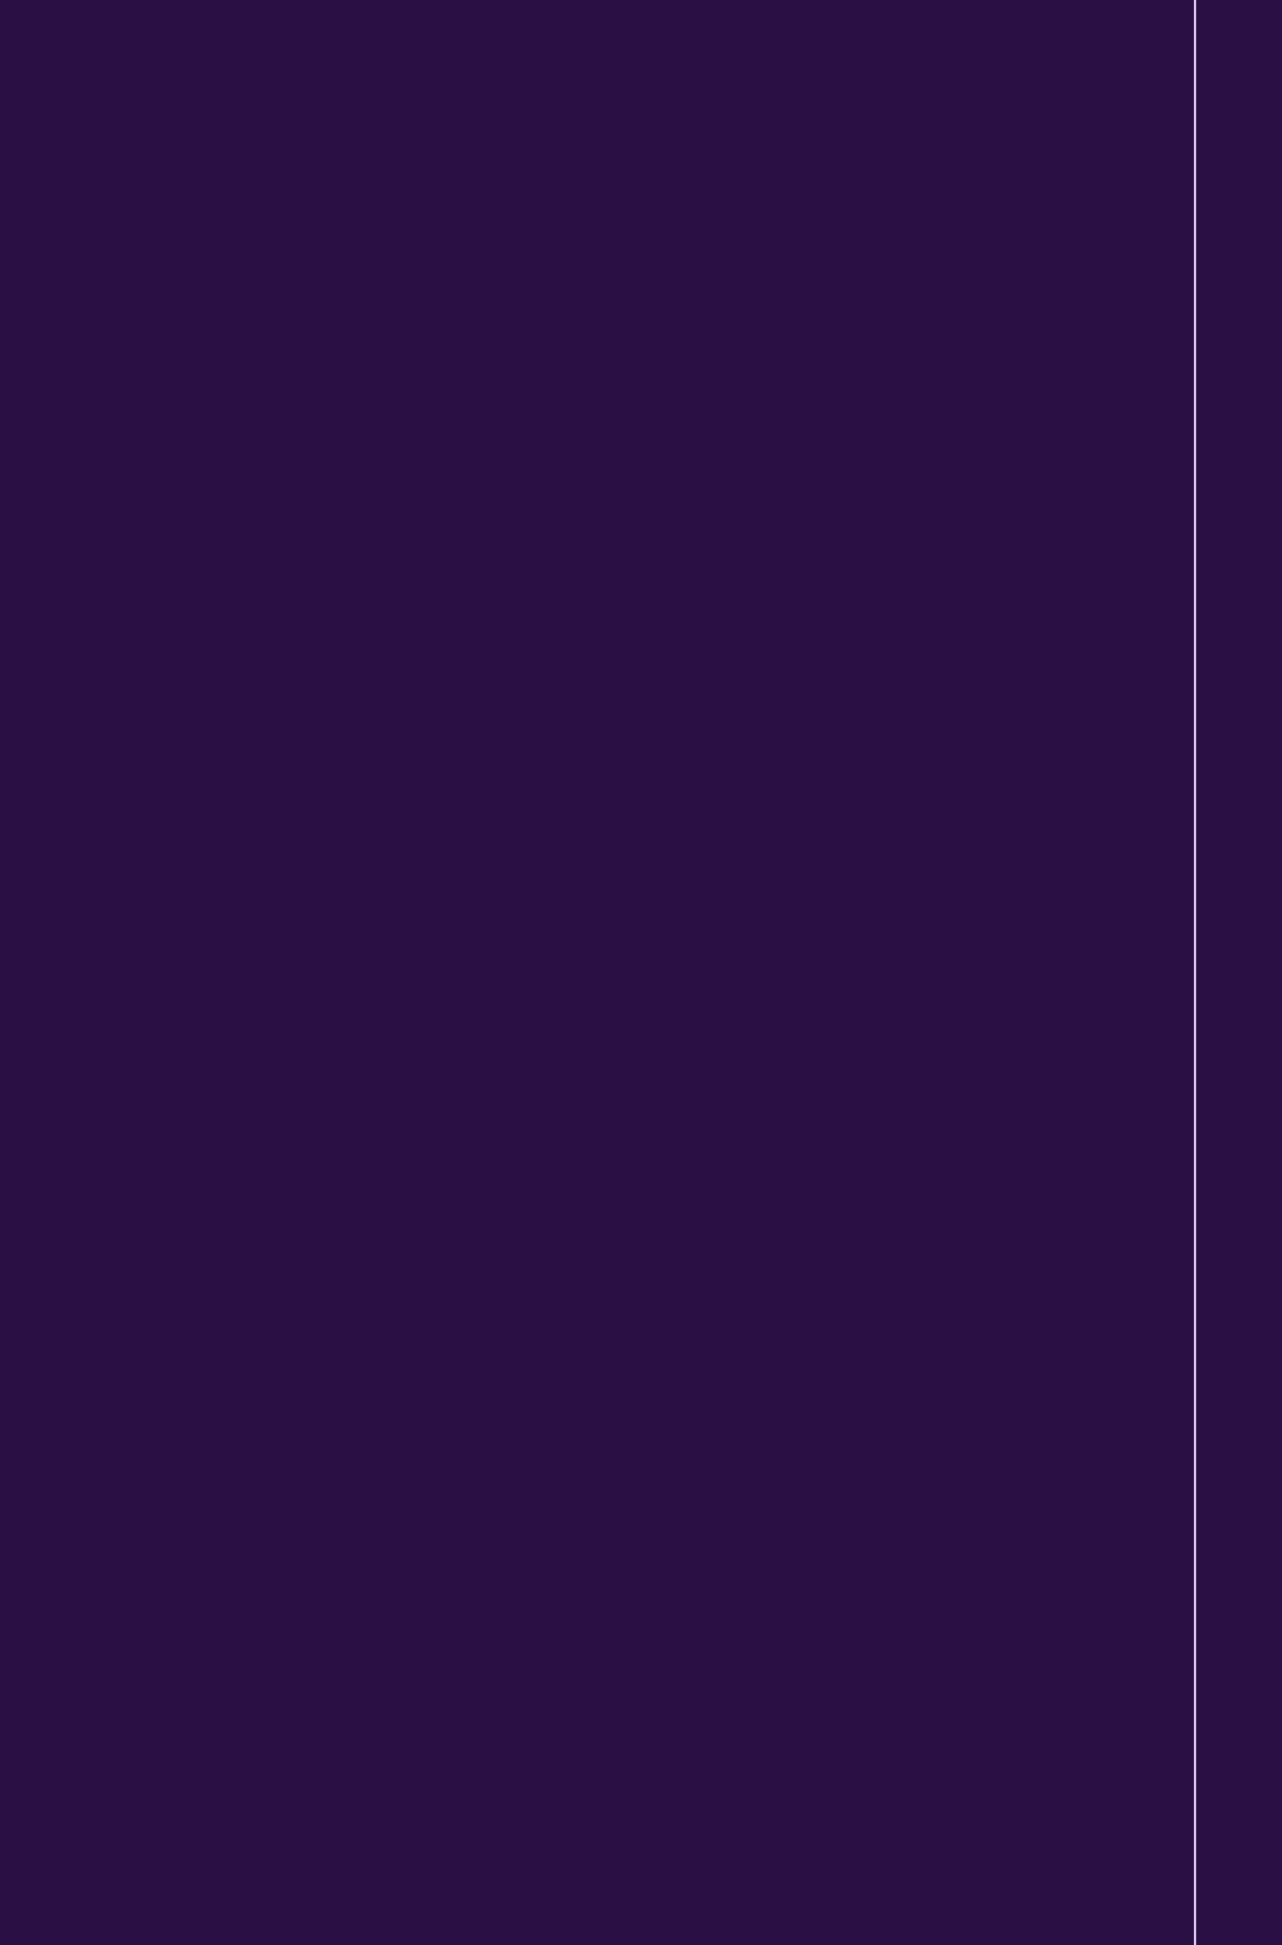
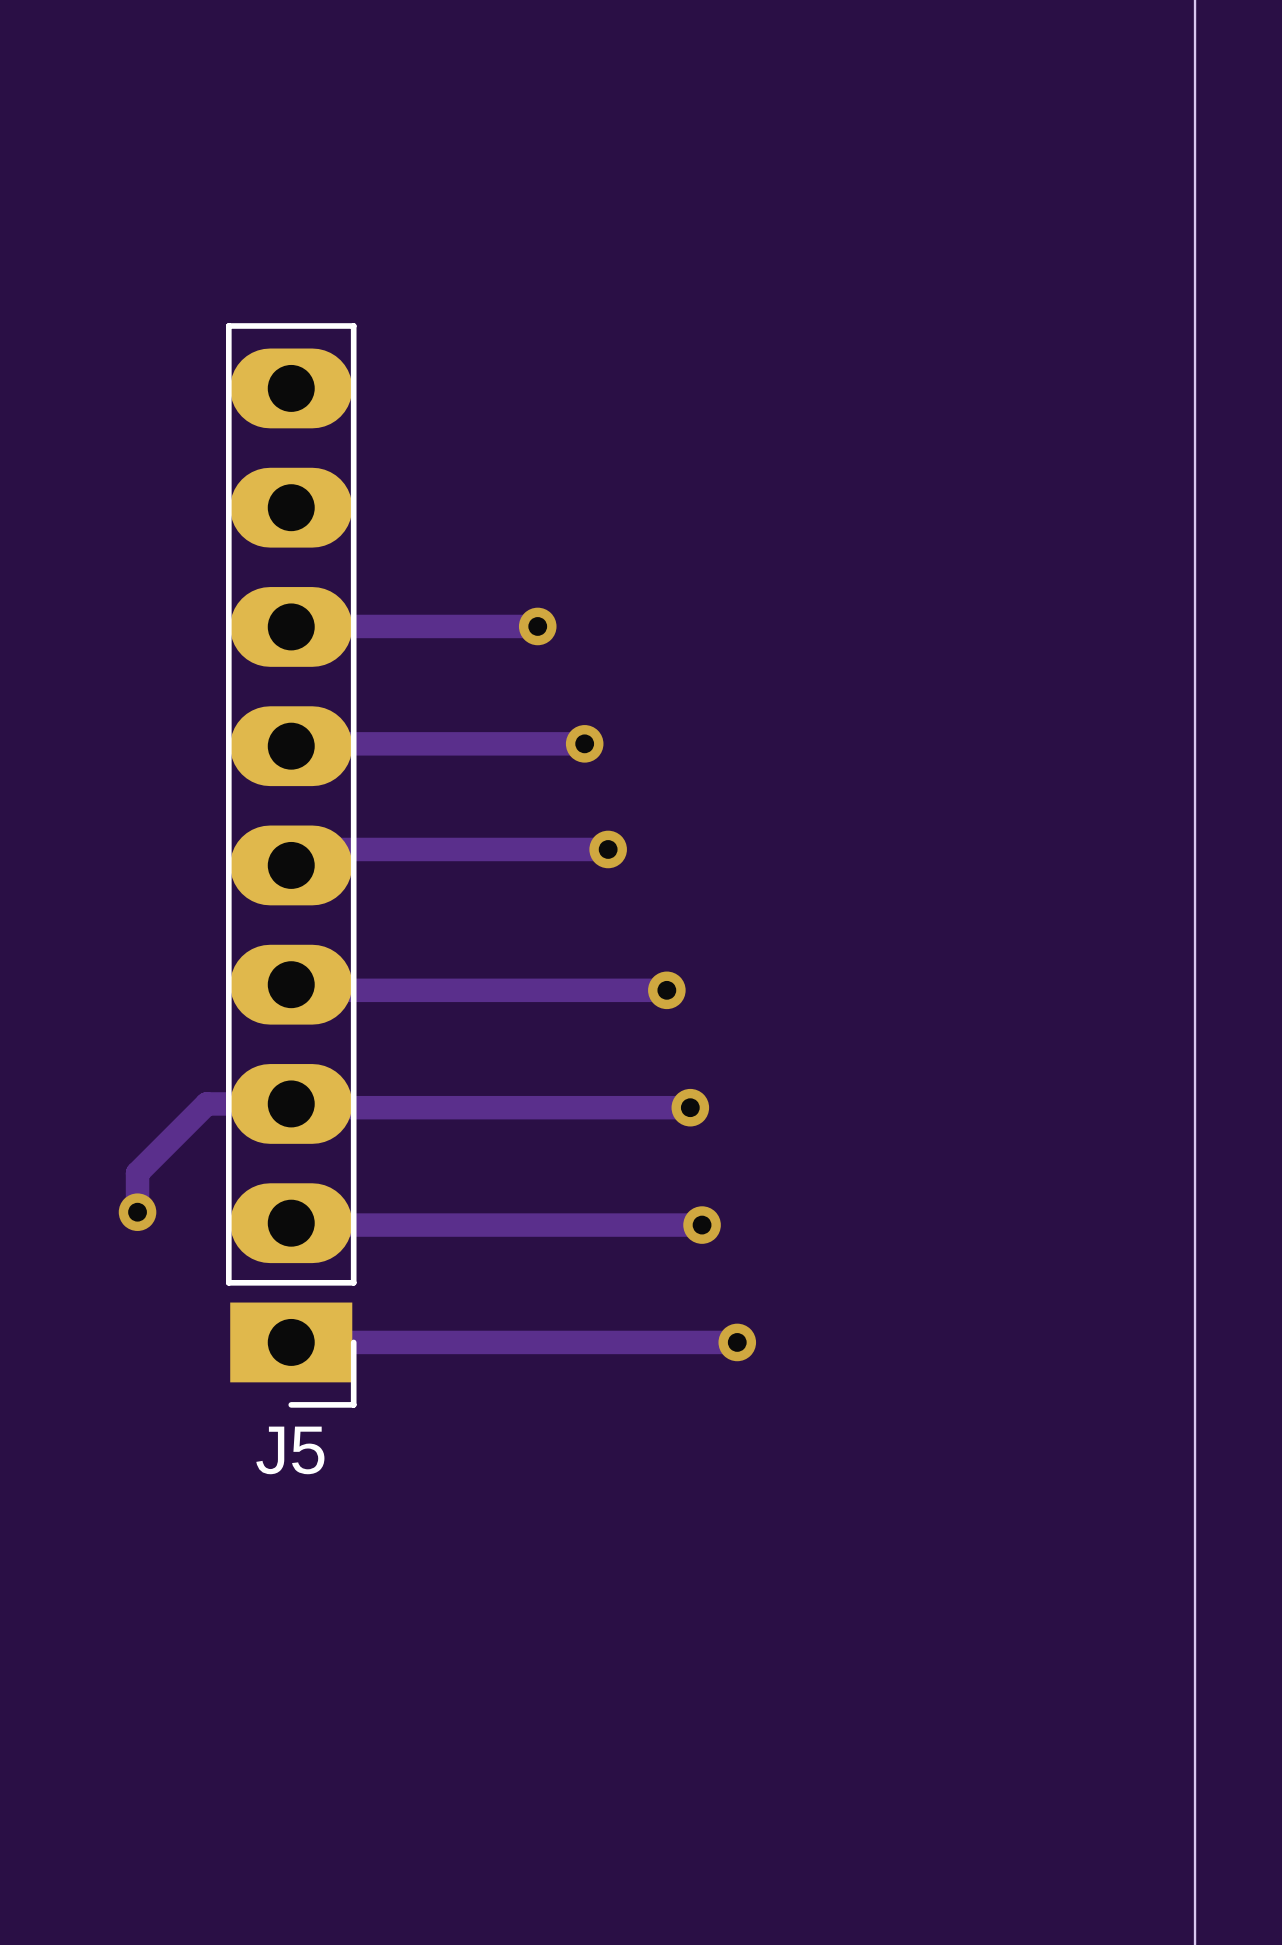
track: none -> (291, 626) (537, 626)
via: none -> (537, 626)
track: none -> (584, 743) (293, 743) (291, 746)
via: none -> (584, 743)
track: none -> (608, 849) (307, 849) (291, 865)
via: none -> (608, 849)
J5: none -> (291, 865)
track: none -> (291, 984) (296, 990) (666, 990)
via: none -> (666, 990)
track: none -> (690, 1107) (295, 1107) (291, 1103) (206, 1103) (137, 1173) (137, 1212)
via: none -> (690, 1107)
via: none -> (137, 1212)
track: none -> (291, 1223) (293, 1225) (702, 1225)
via: none -> (702, 1225)
track: none -> (291, 1342) (737, 1342)
via: none -> (737, 1342)

